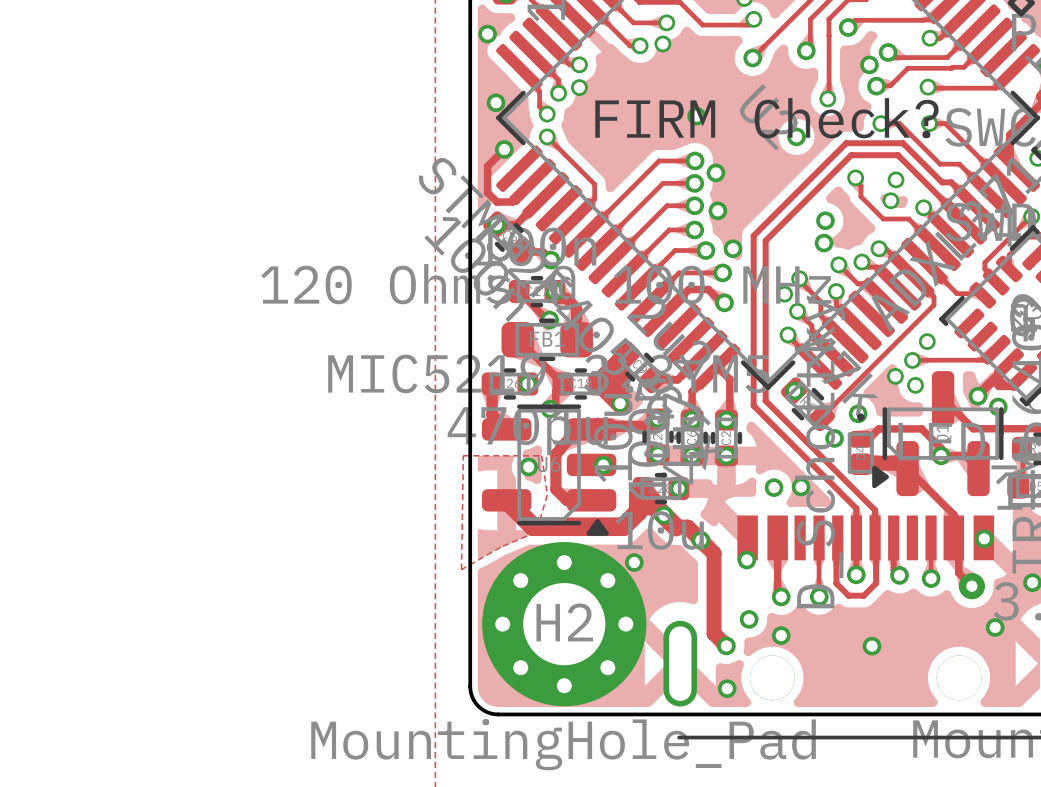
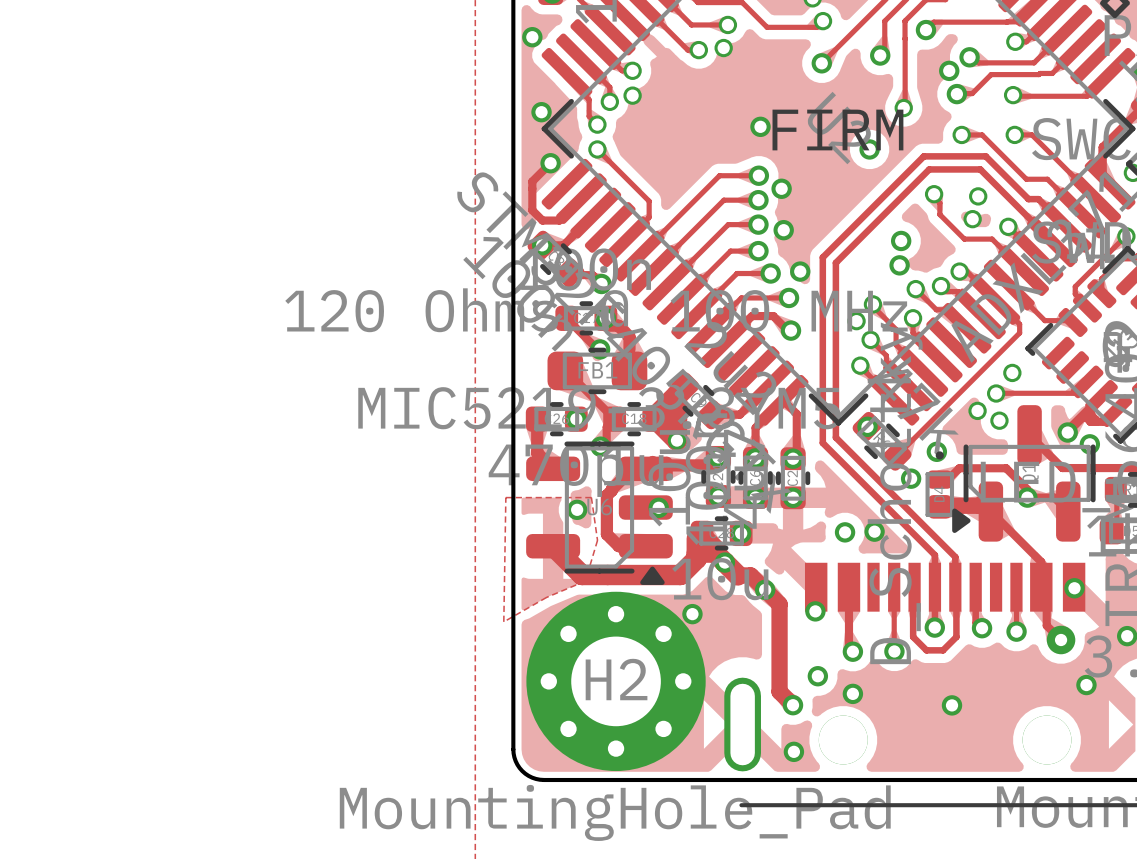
text: FIRM Check? (766, 118) -> FIRM (837, 129)

